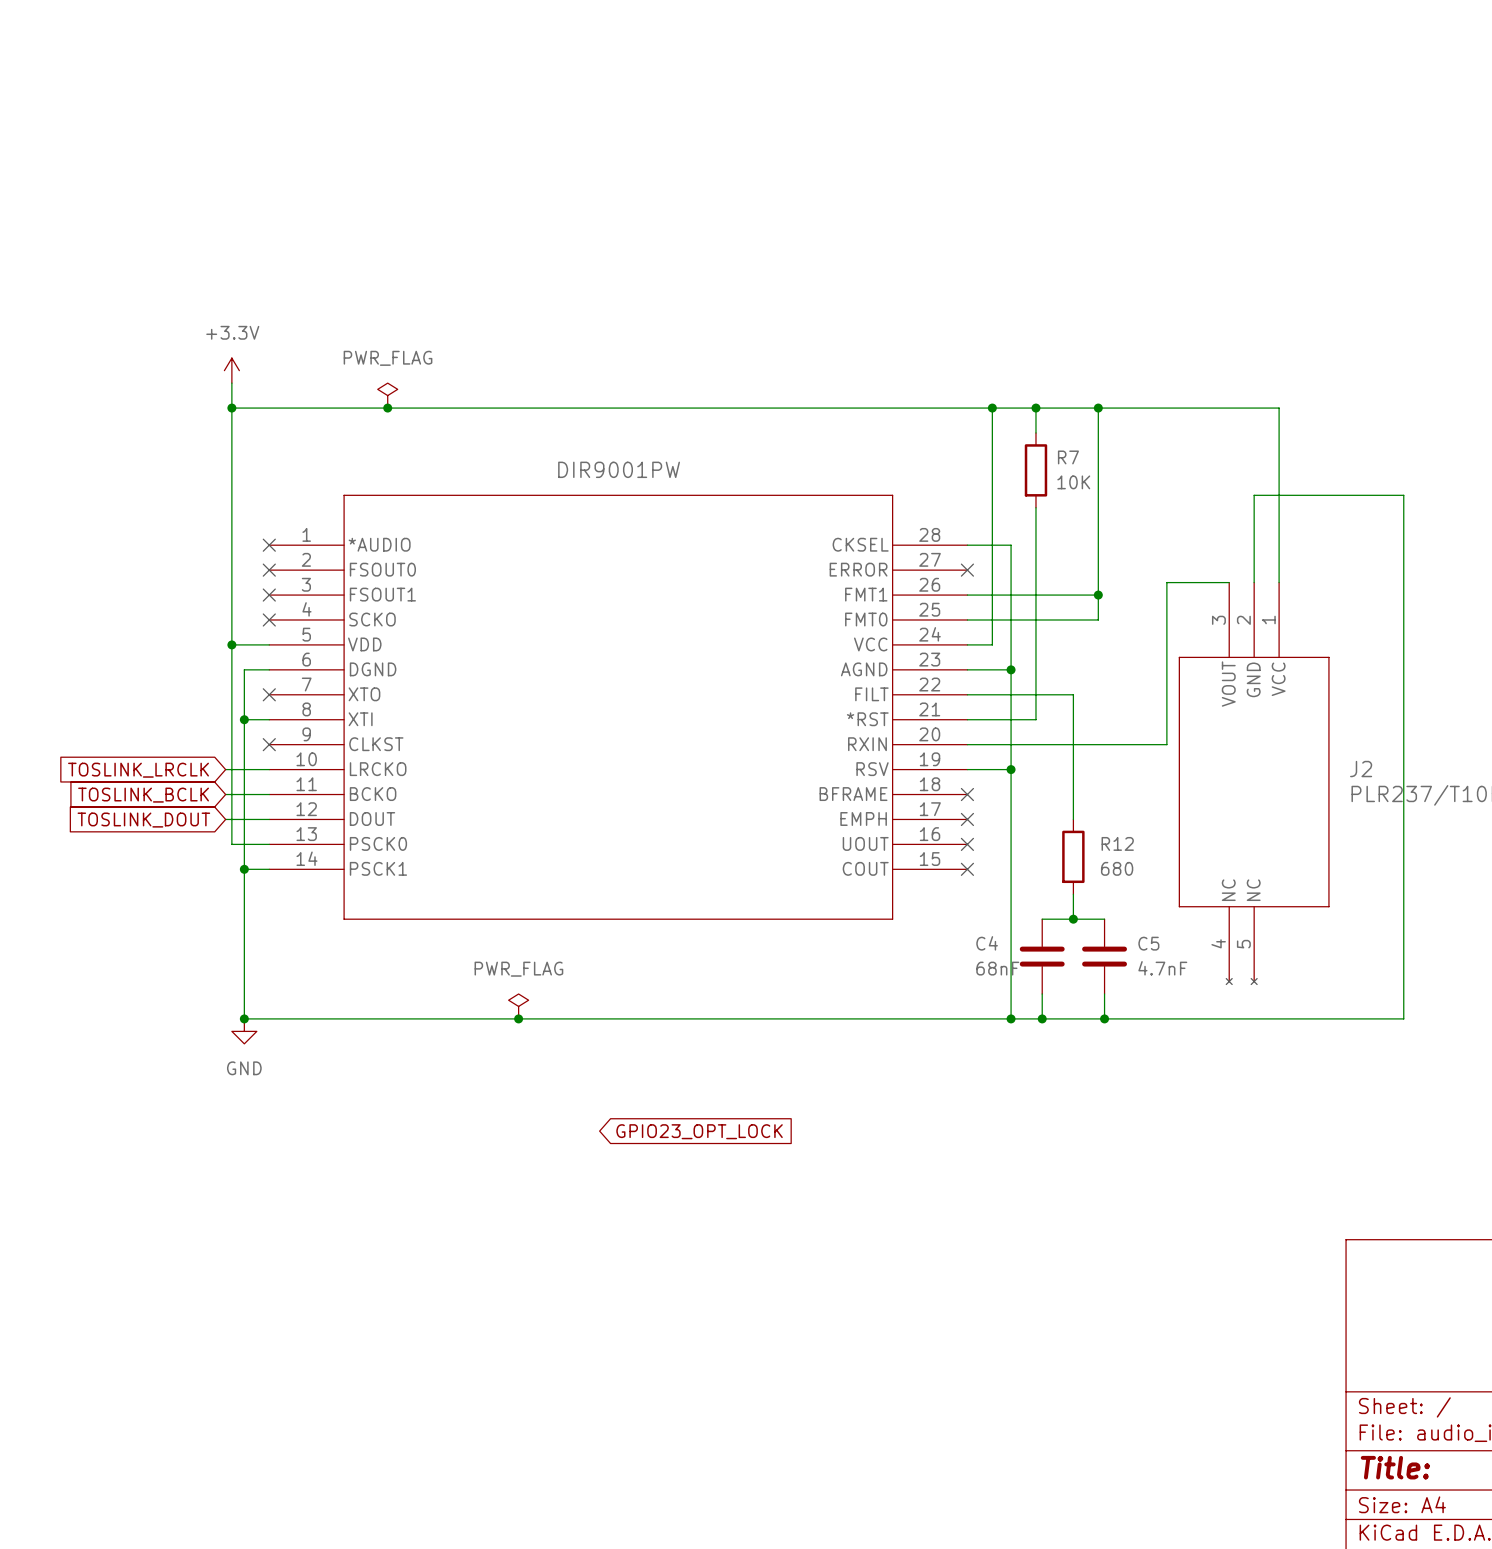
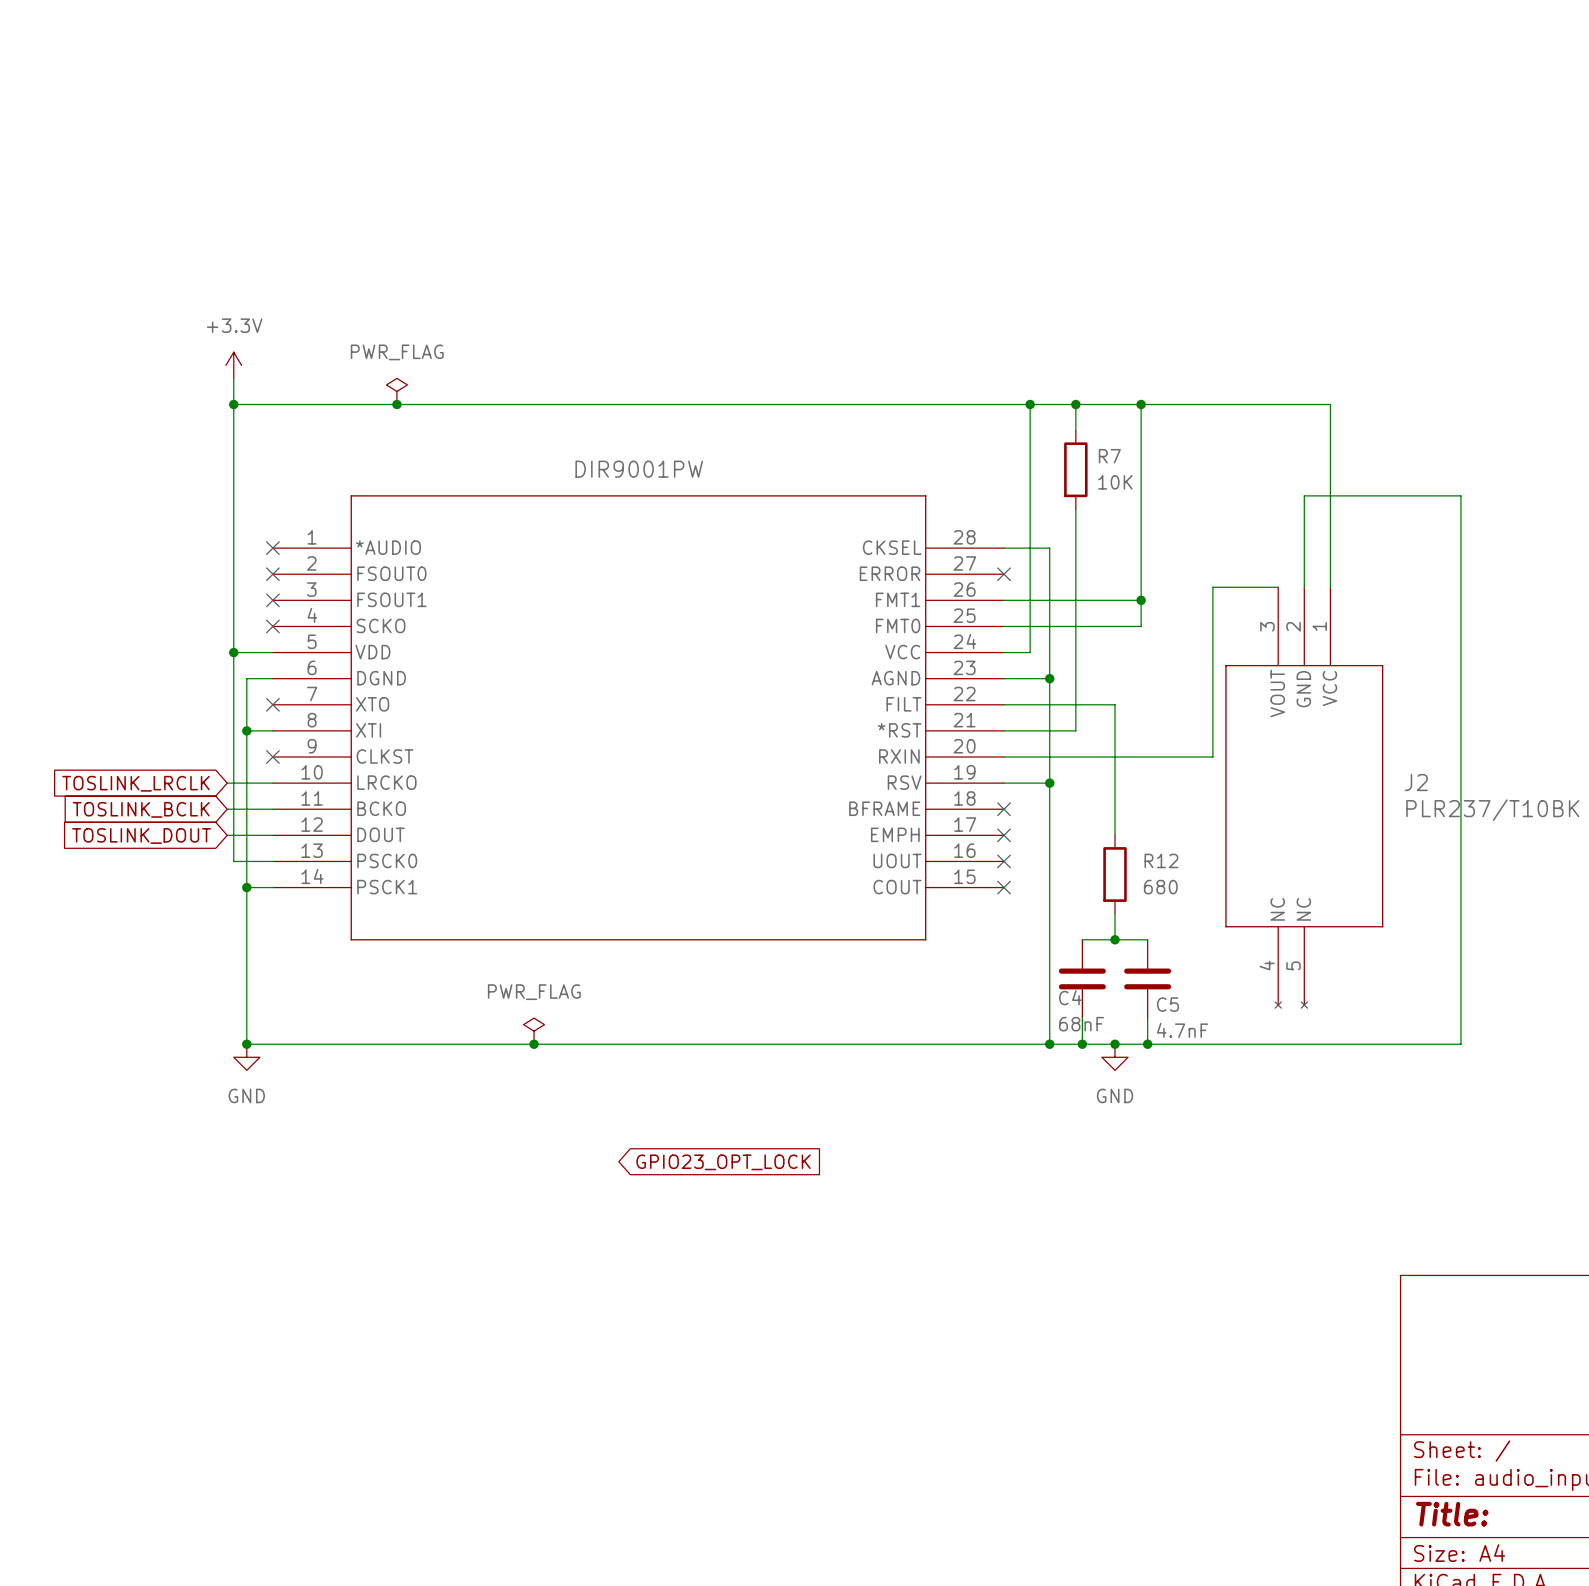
C4 name position: C4 (987, 943) -> C4 (1070, 997)
C5 name position: C5 (1148, 943) -> C5 (1167, 1004)
C4 value position: 68nF (997, 968) -> 68nF (1081, 1024)
C5 value position: 4.7nF (1162, 968) -> 4.7nF (1182, 1030)
junction: none -> (1115, 1044)
power symbol: none -> GND (1115, 1057)

